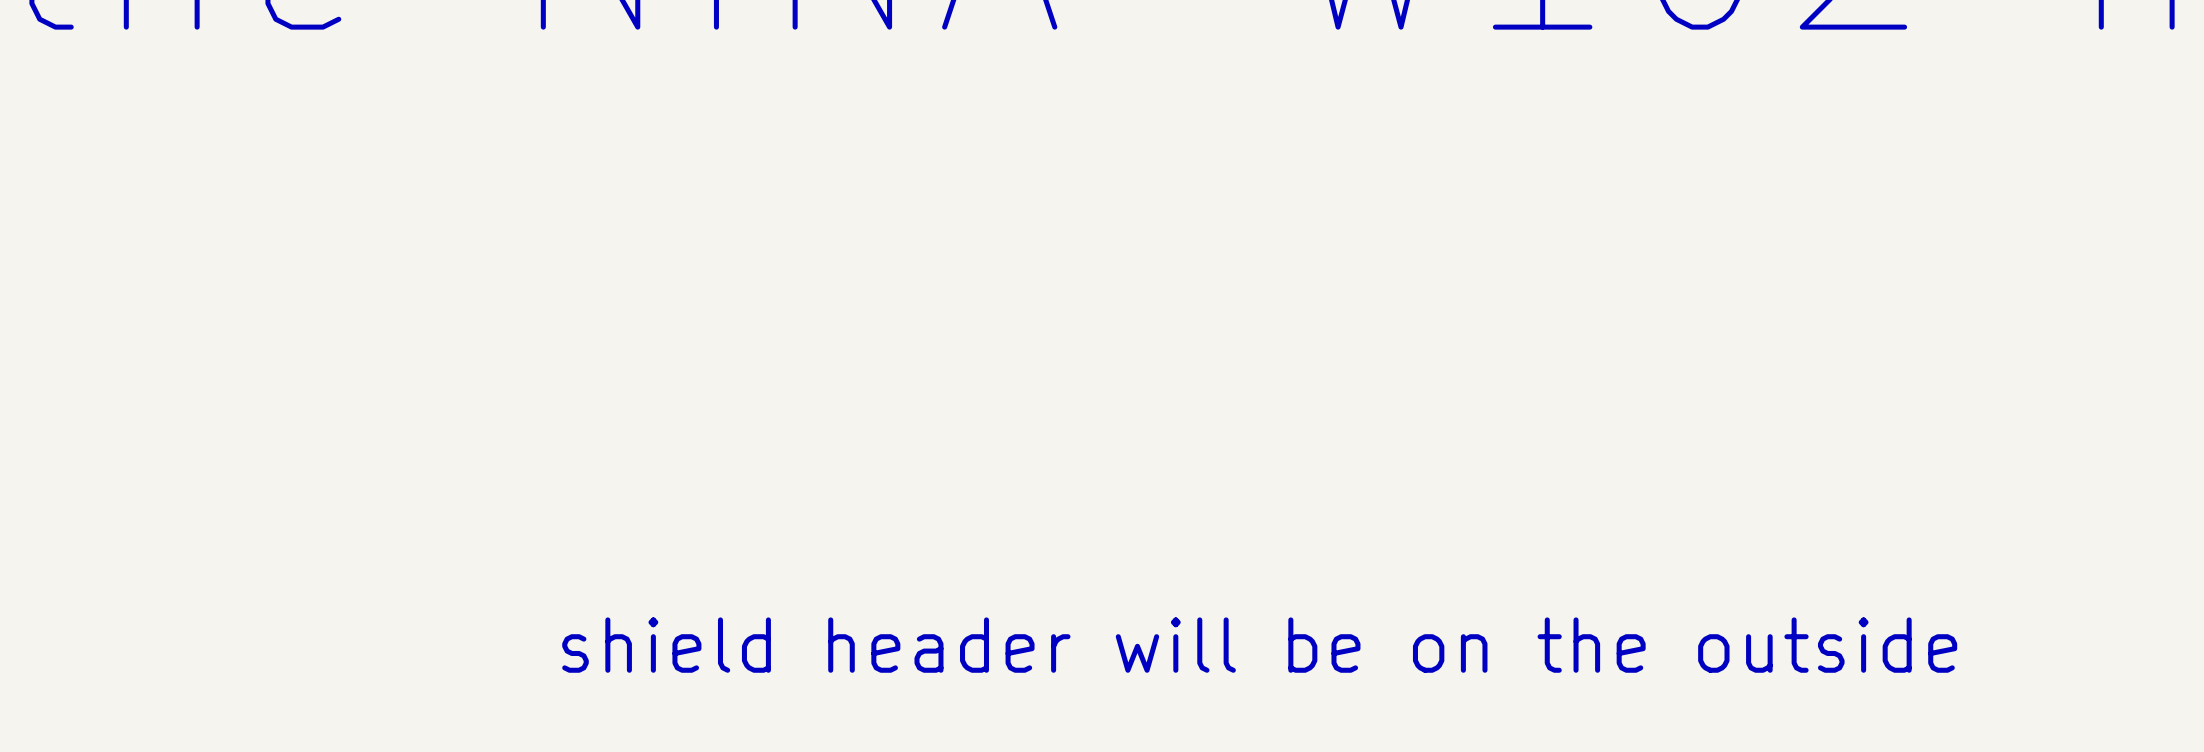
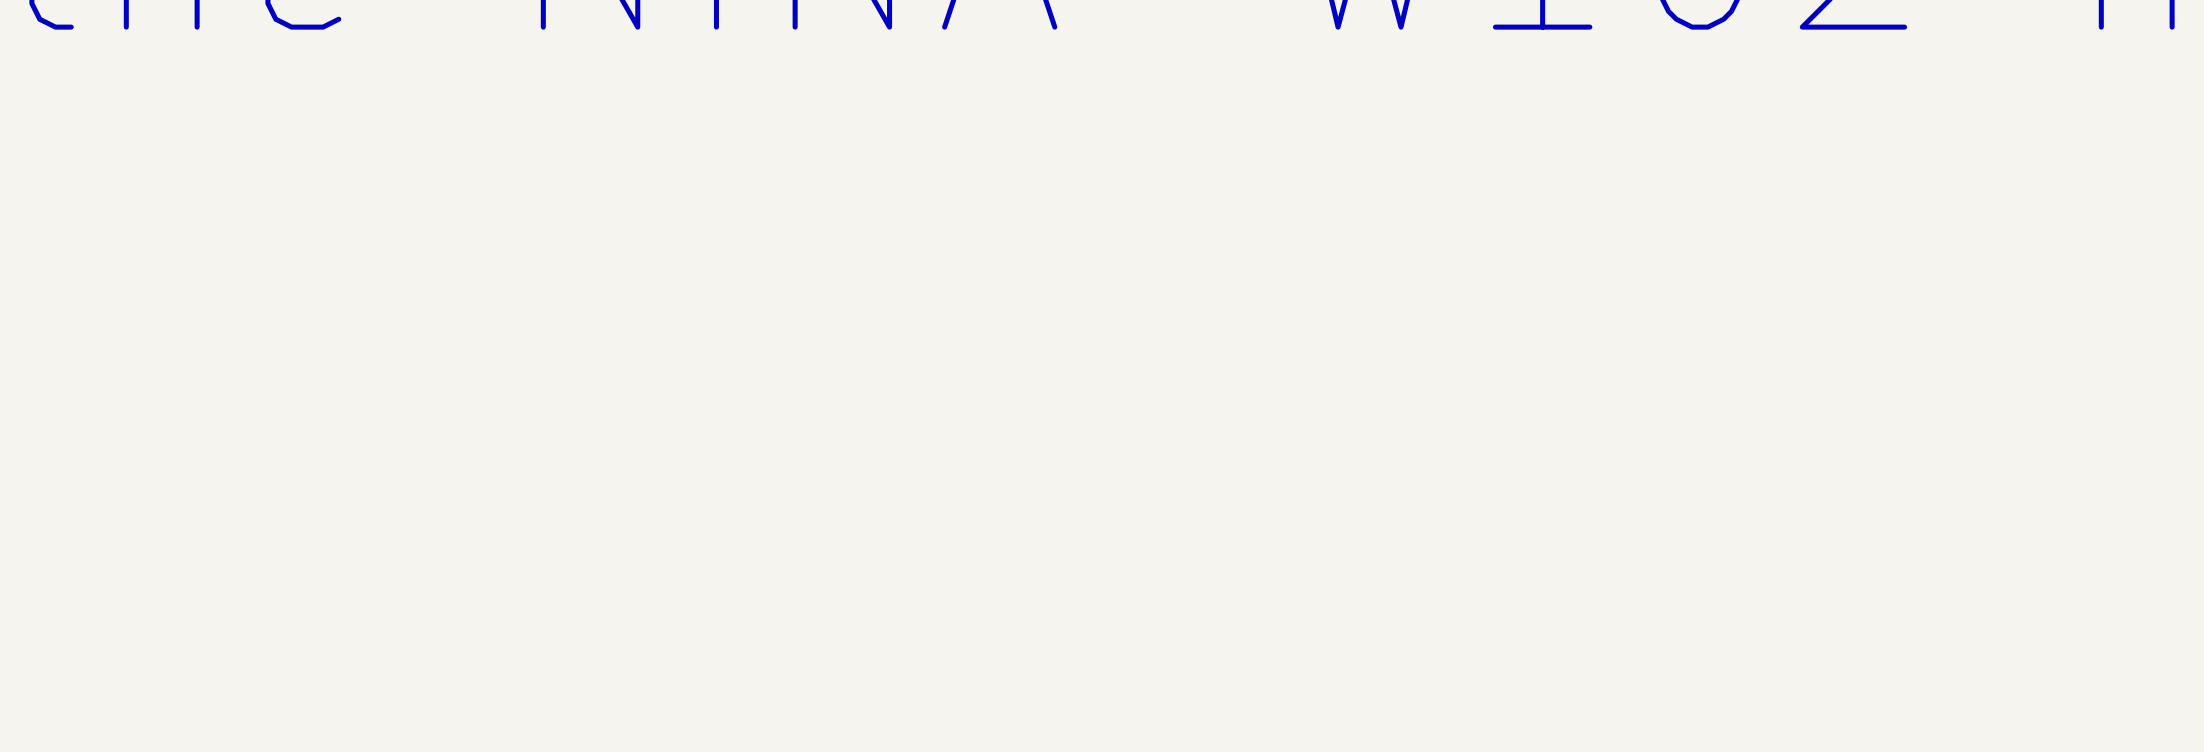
text: shield header will be on the outside (1259, 645) -> none

